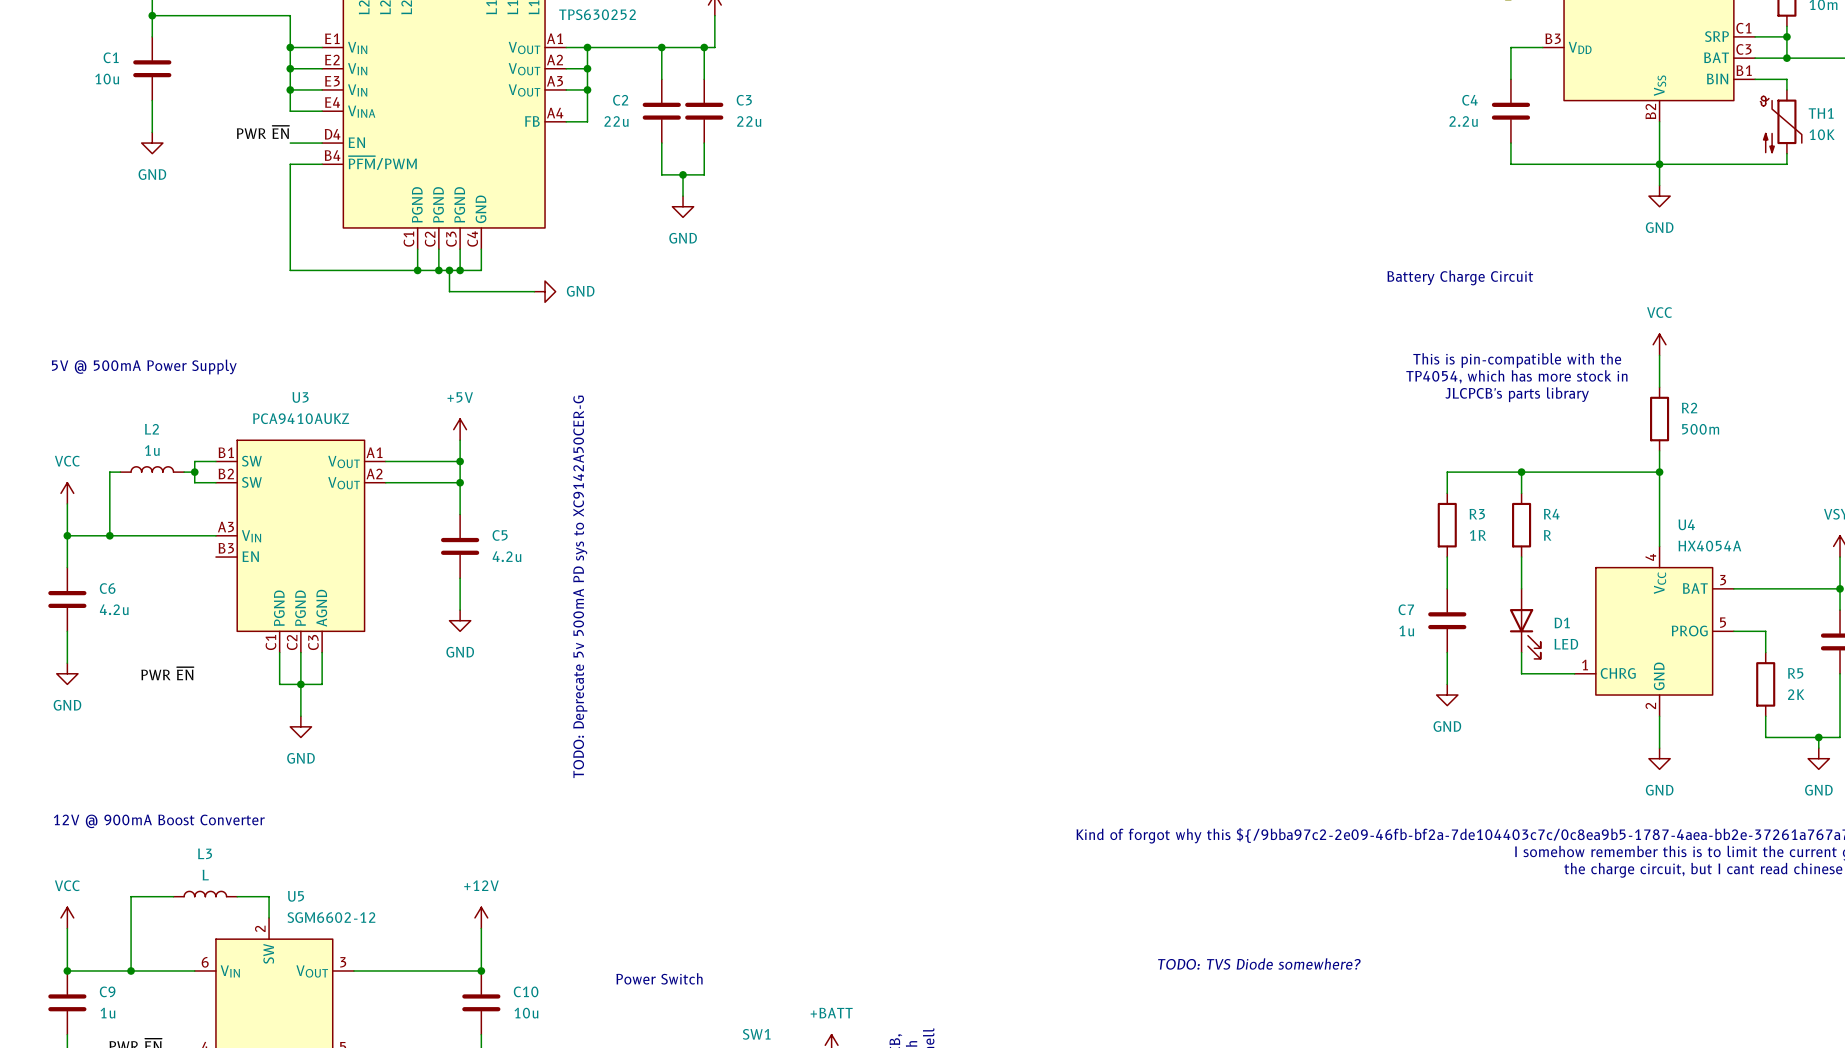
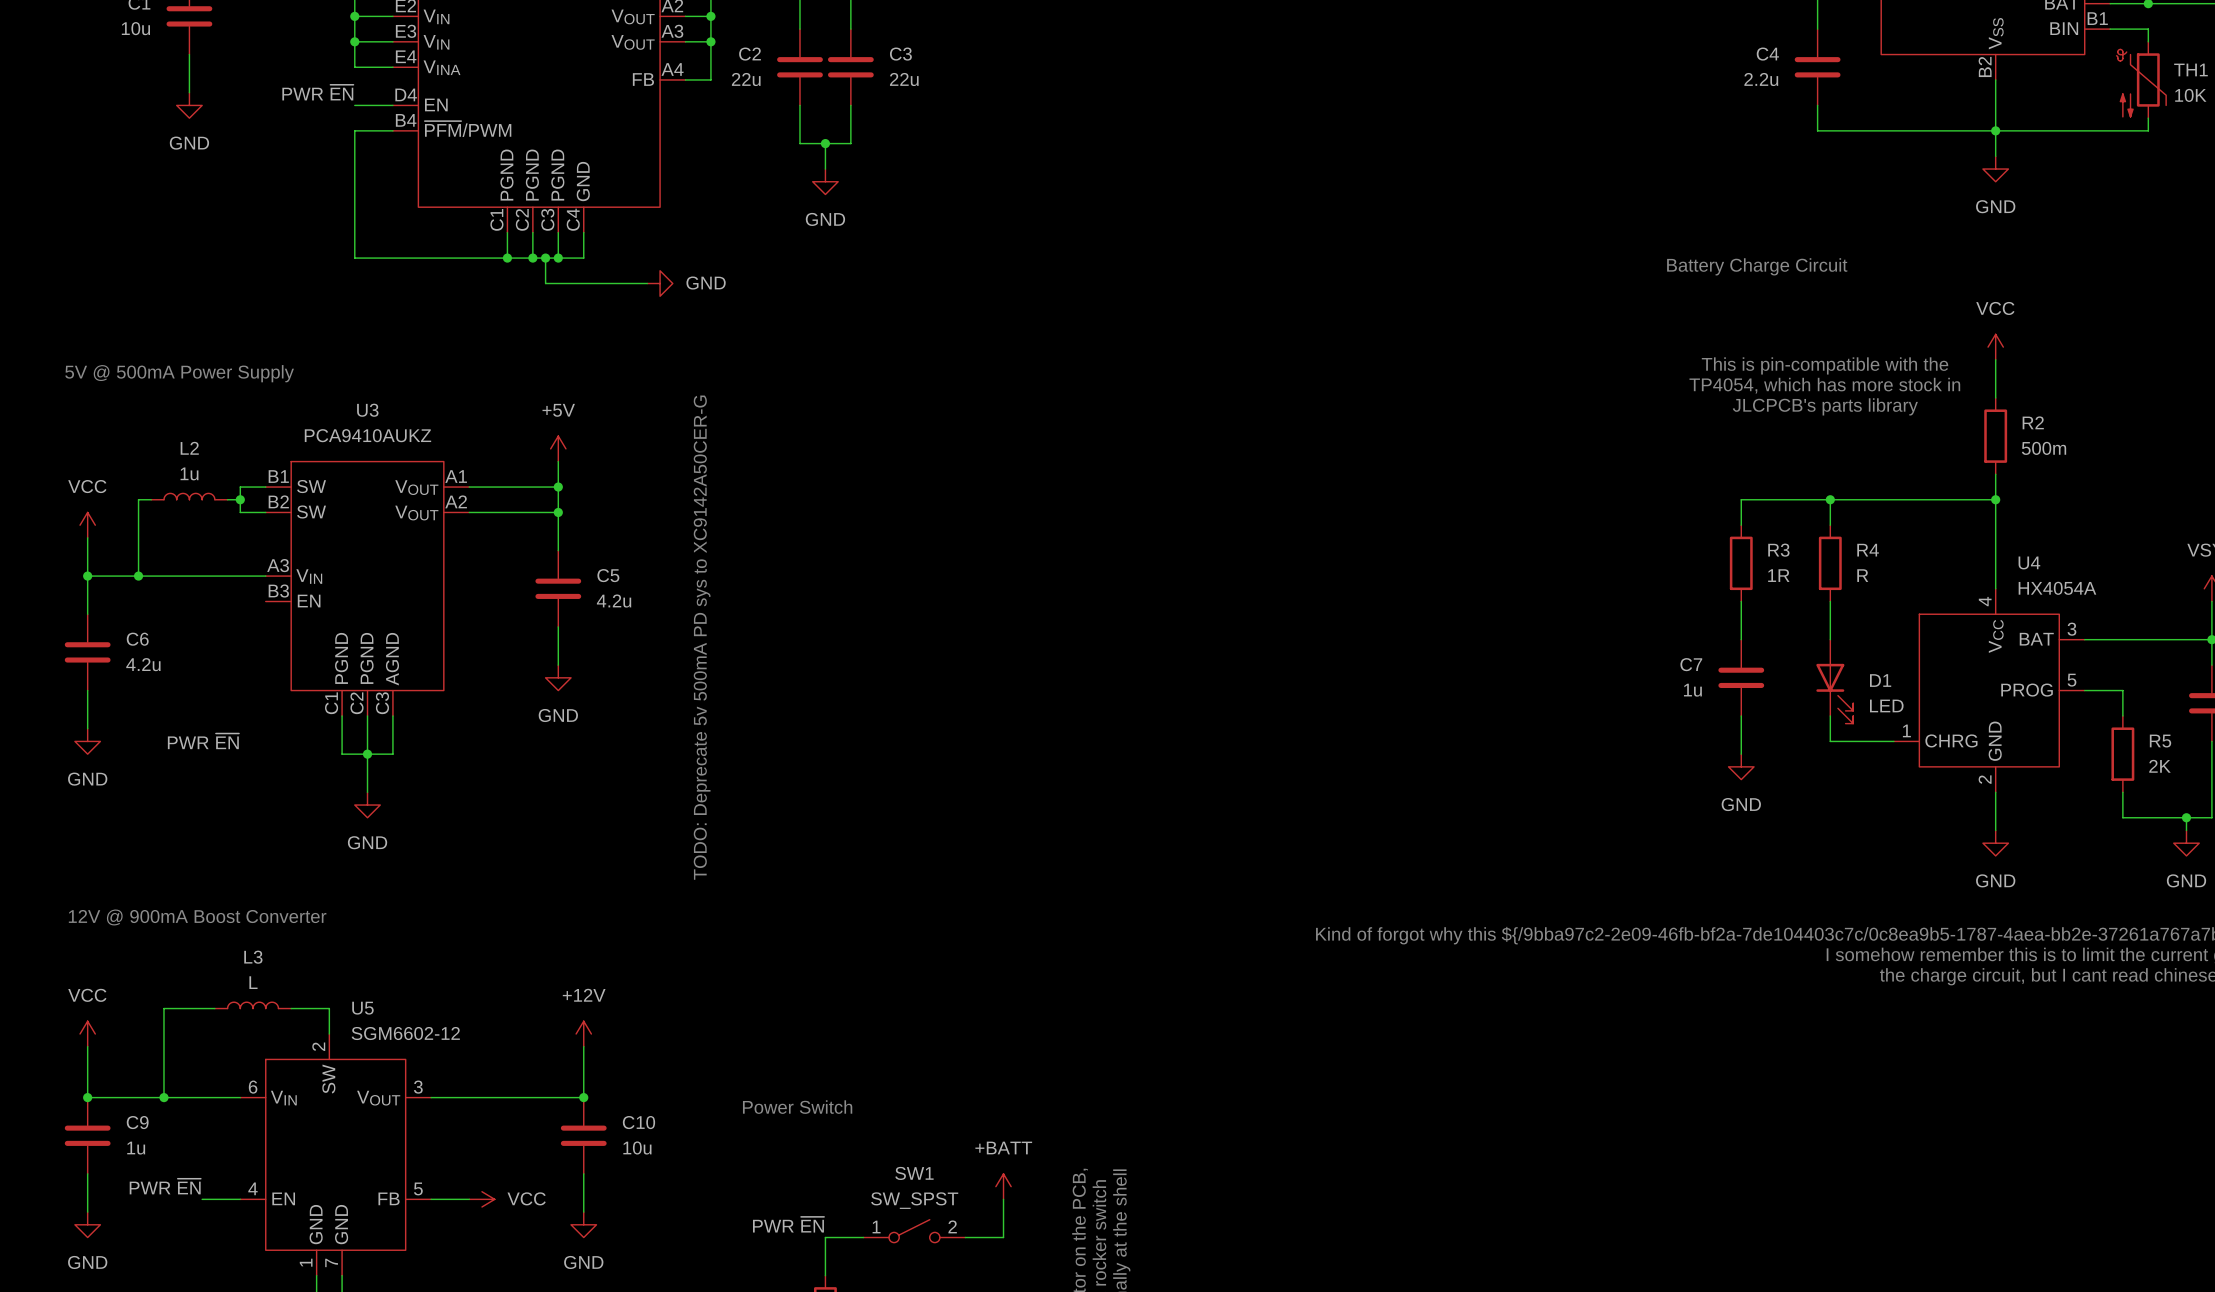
text: TODO: TVS Diode somewhere? (1259, 963) -> none

